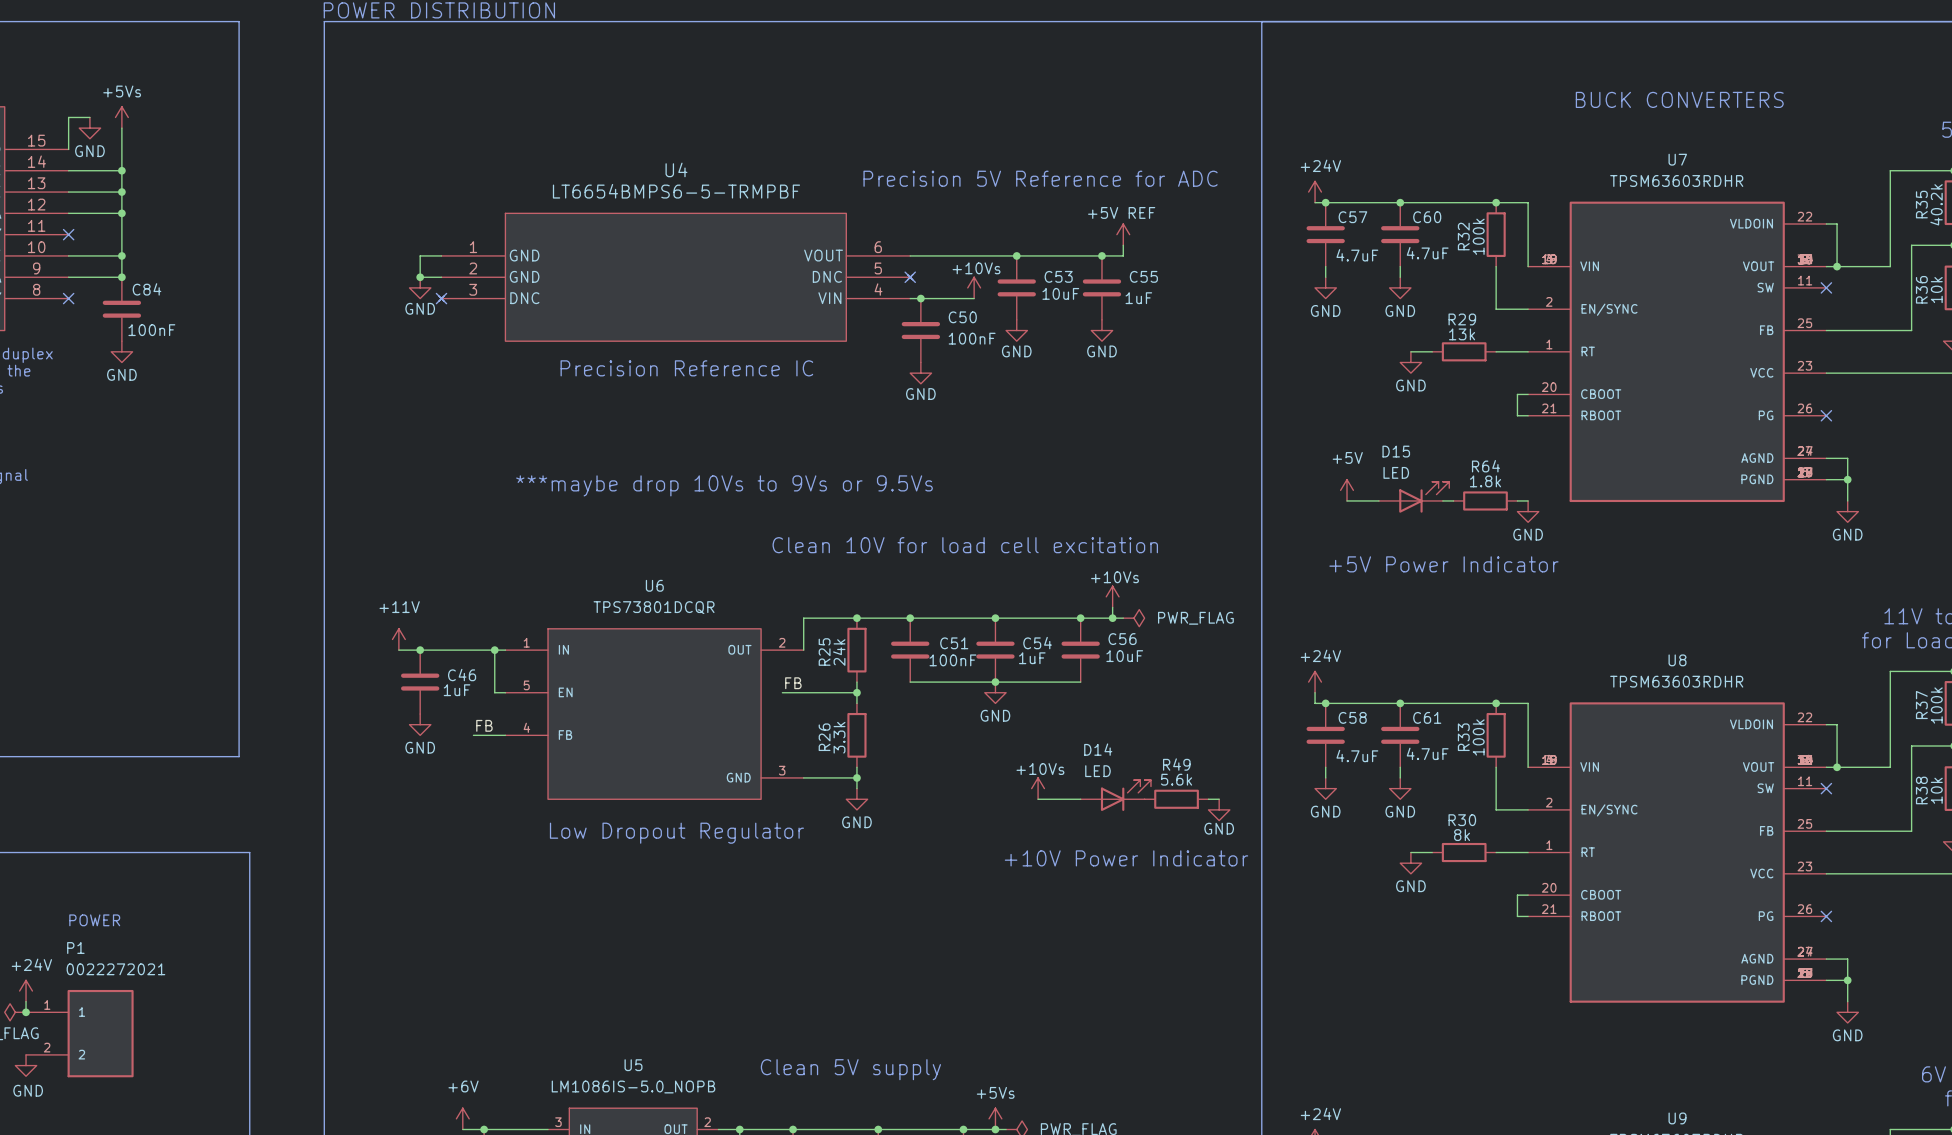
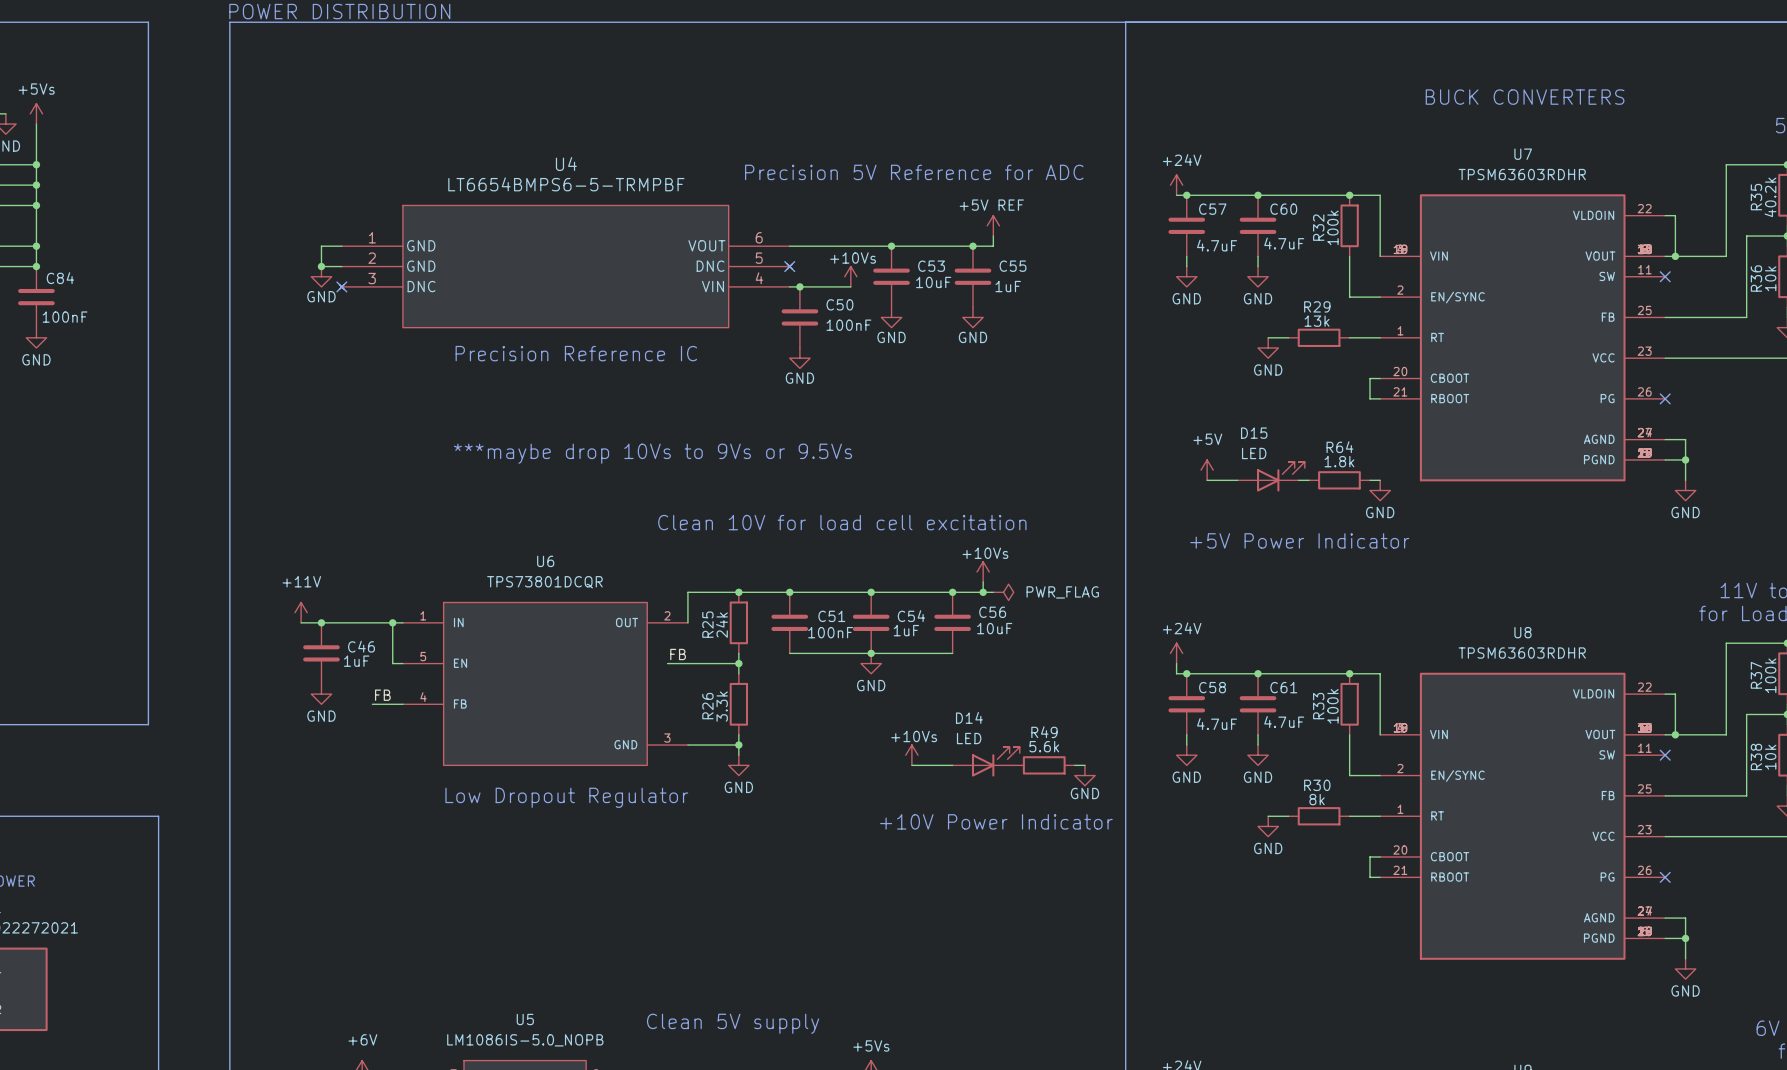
text position: ***maybe drop 10Vs to 9Vs or 9.5Vs (724, 485) -> ***maybe drop 10Vs to 9Vs or 9.5Vs (652, 453)

